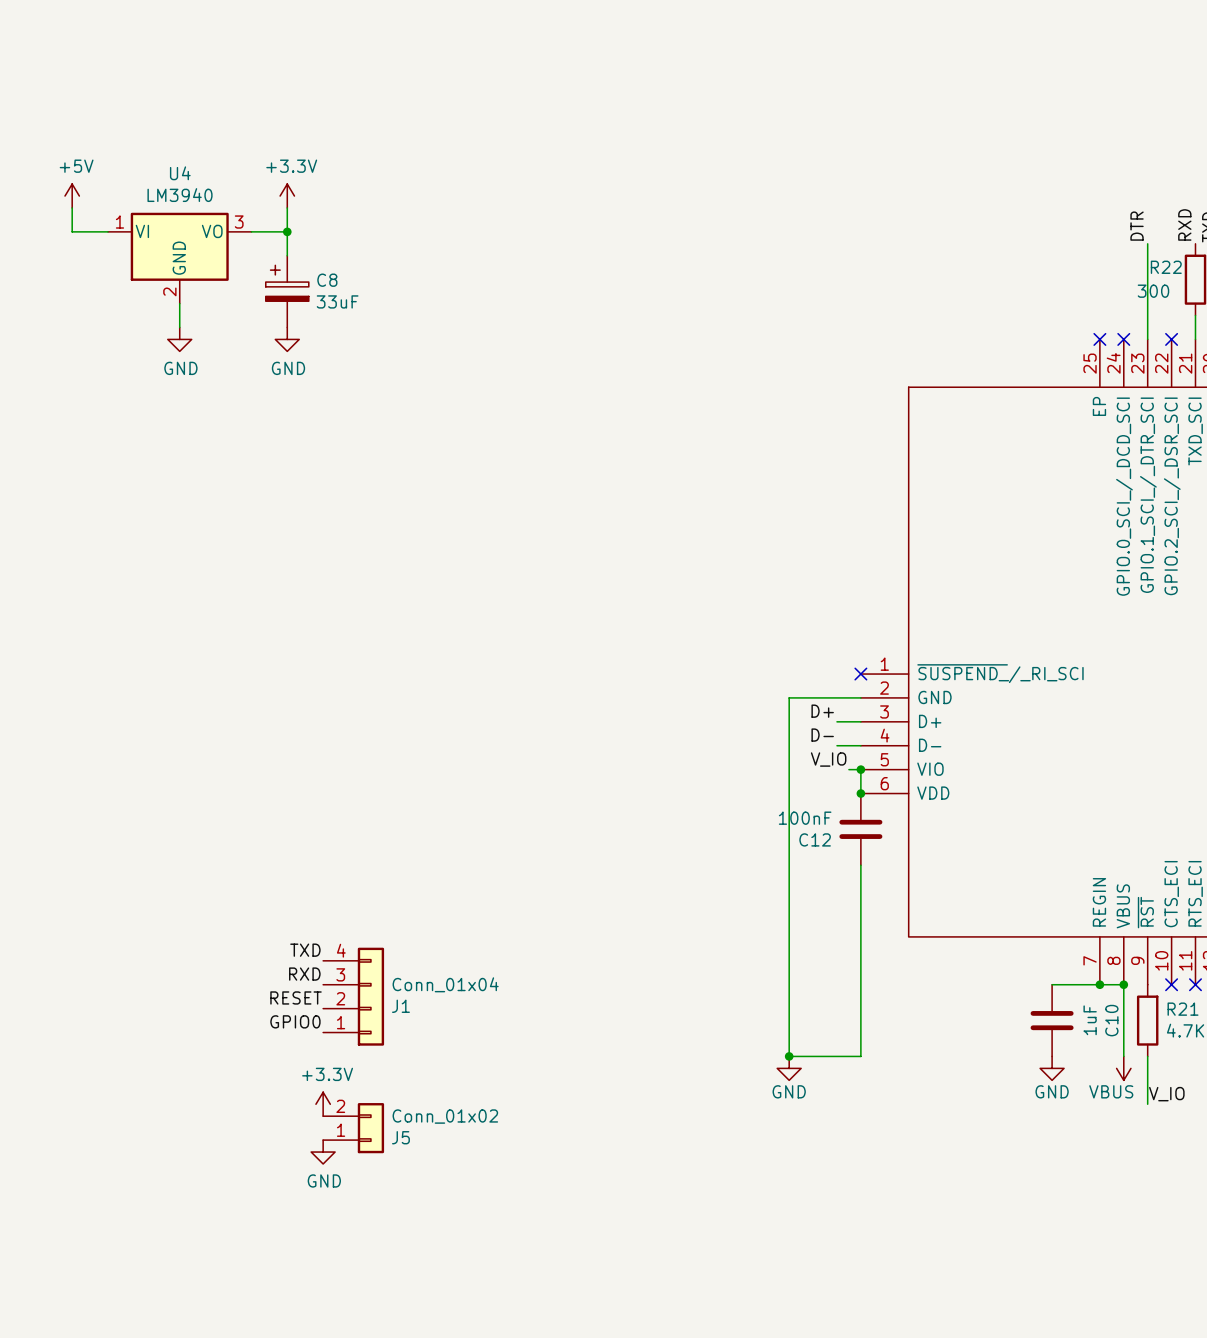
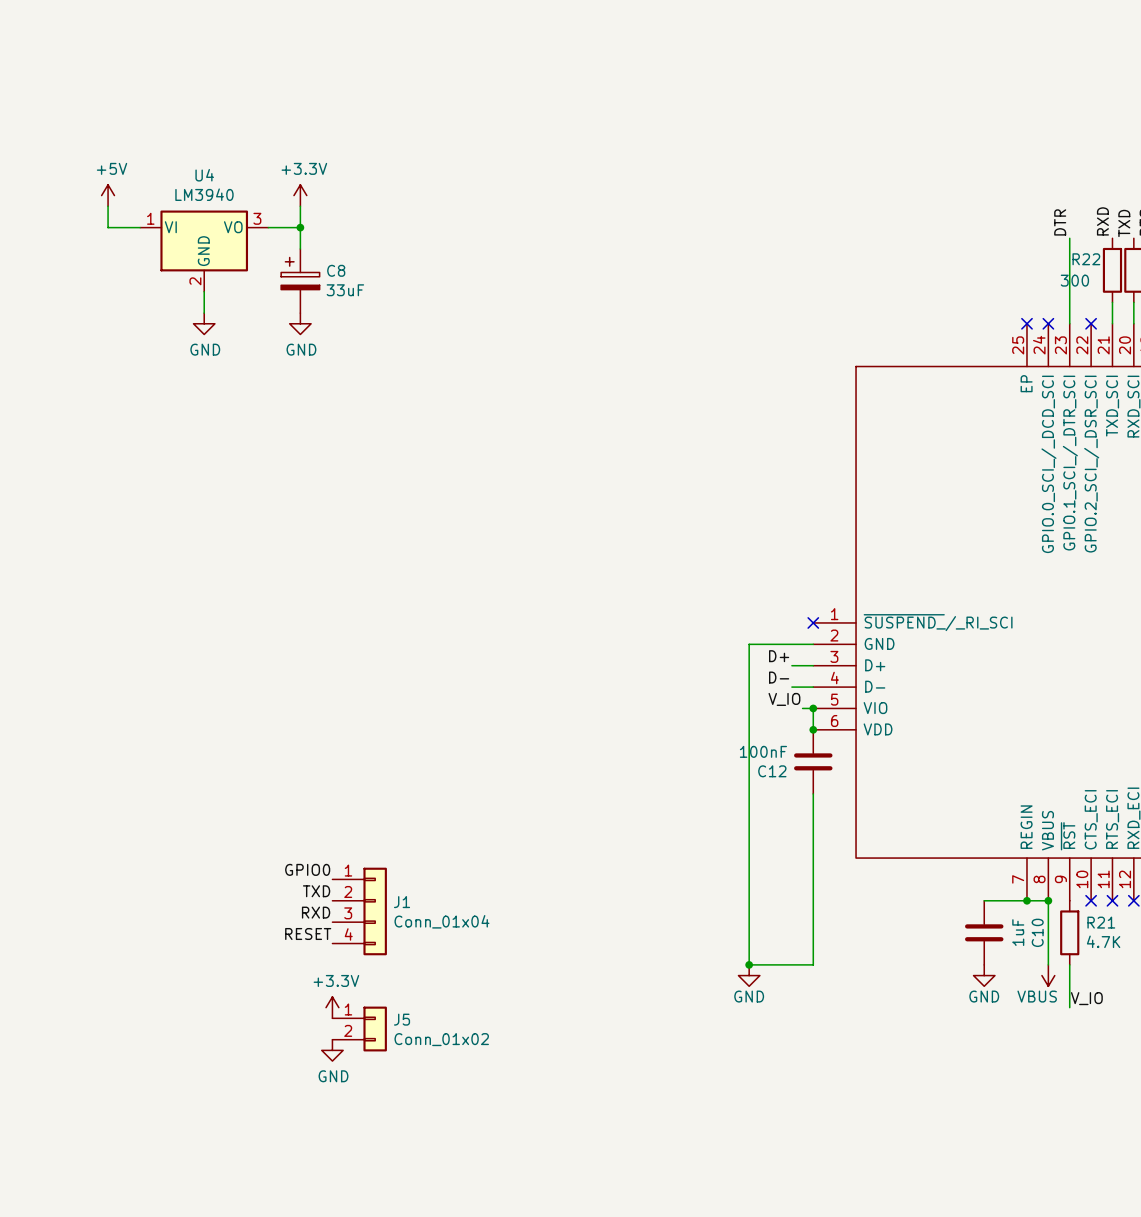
label: TXD (305, 950) -> GPIO0 (307, 869)
label: RXD (304, 974) -> TXD (316, 891)
J1 flip: as is (370, 996) -> up-down (375, 911)
label: RESET (296, 997) -> RXD (316, 912)
label: GPIO0 (295, 1021) -> RESET (308, 933)
J5 flip: as is (370, 1128) -> up-down (375, 1029)

